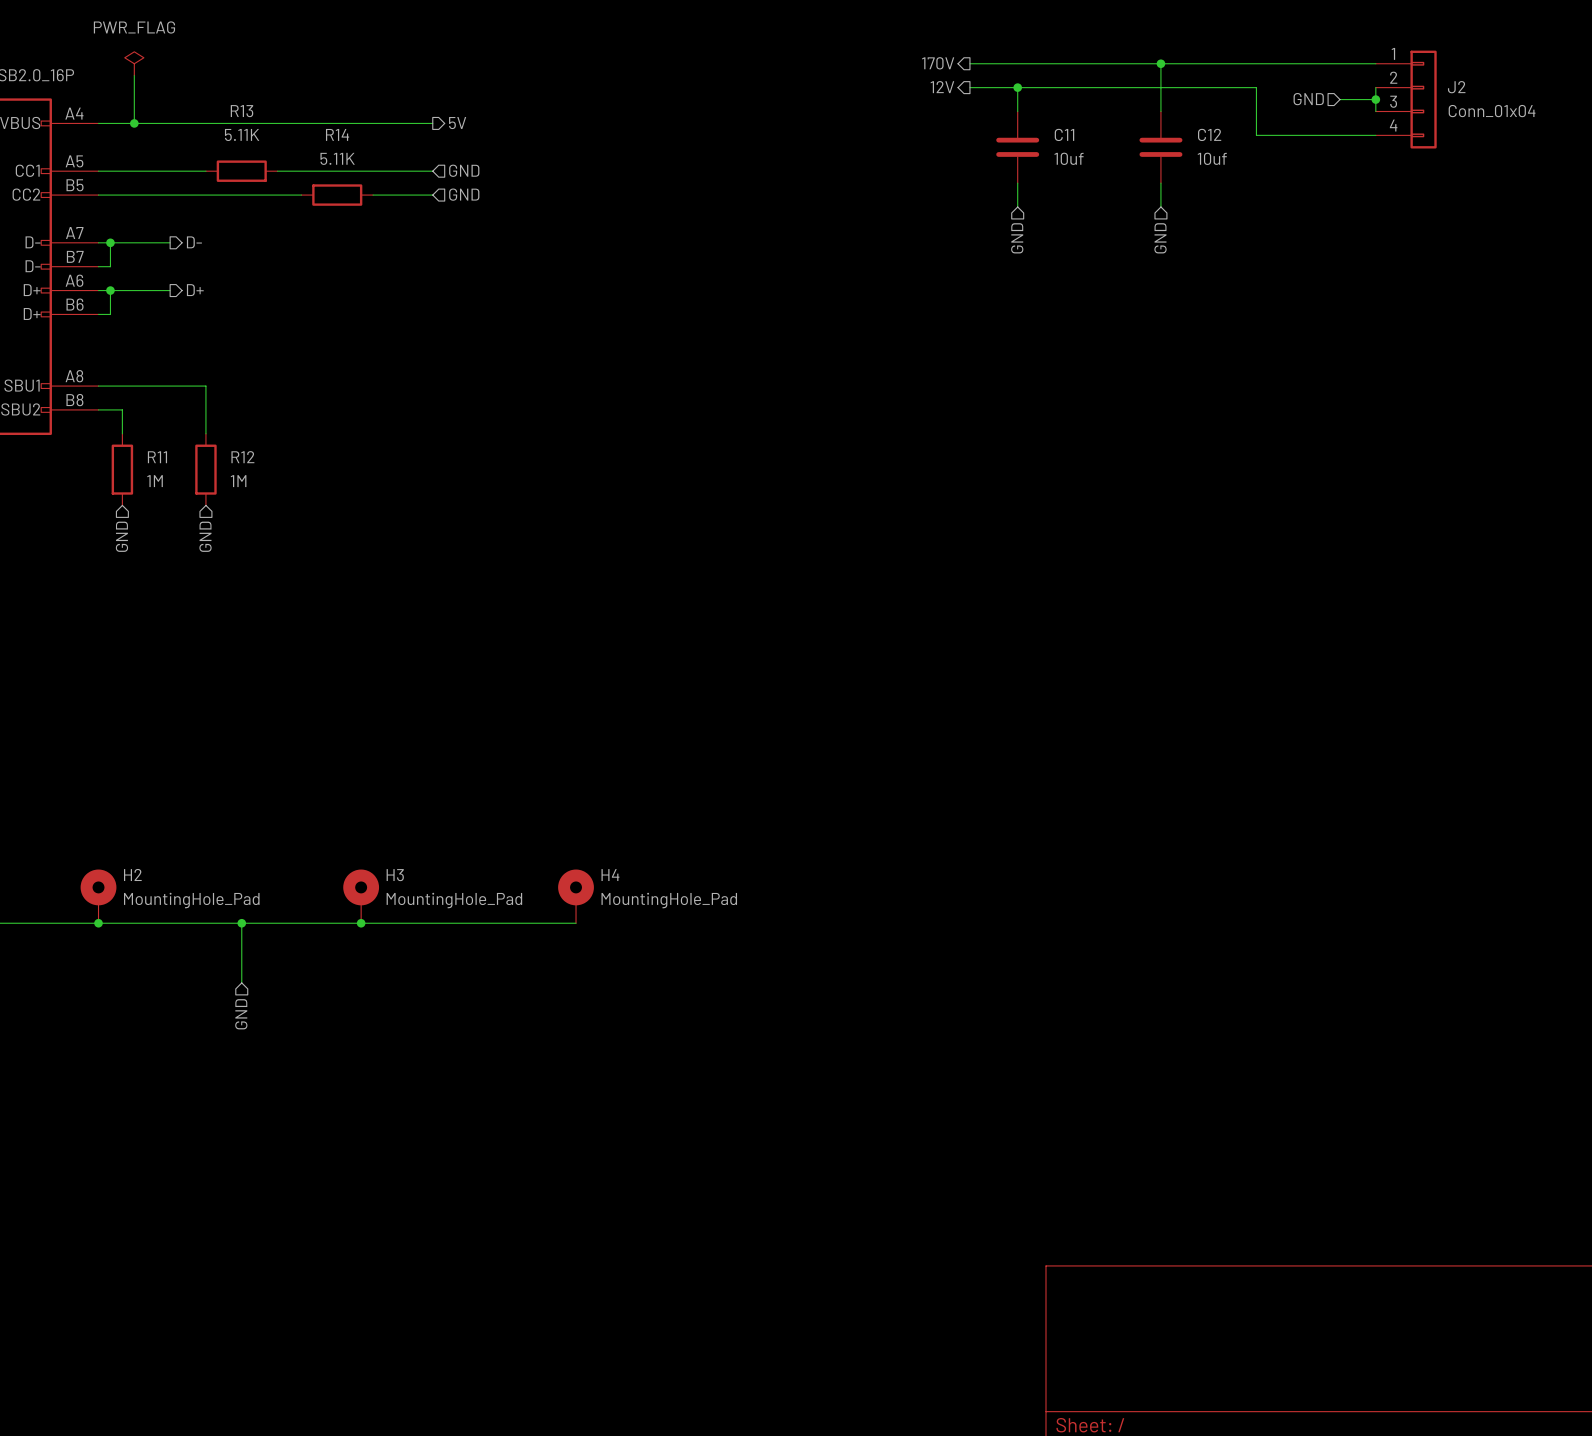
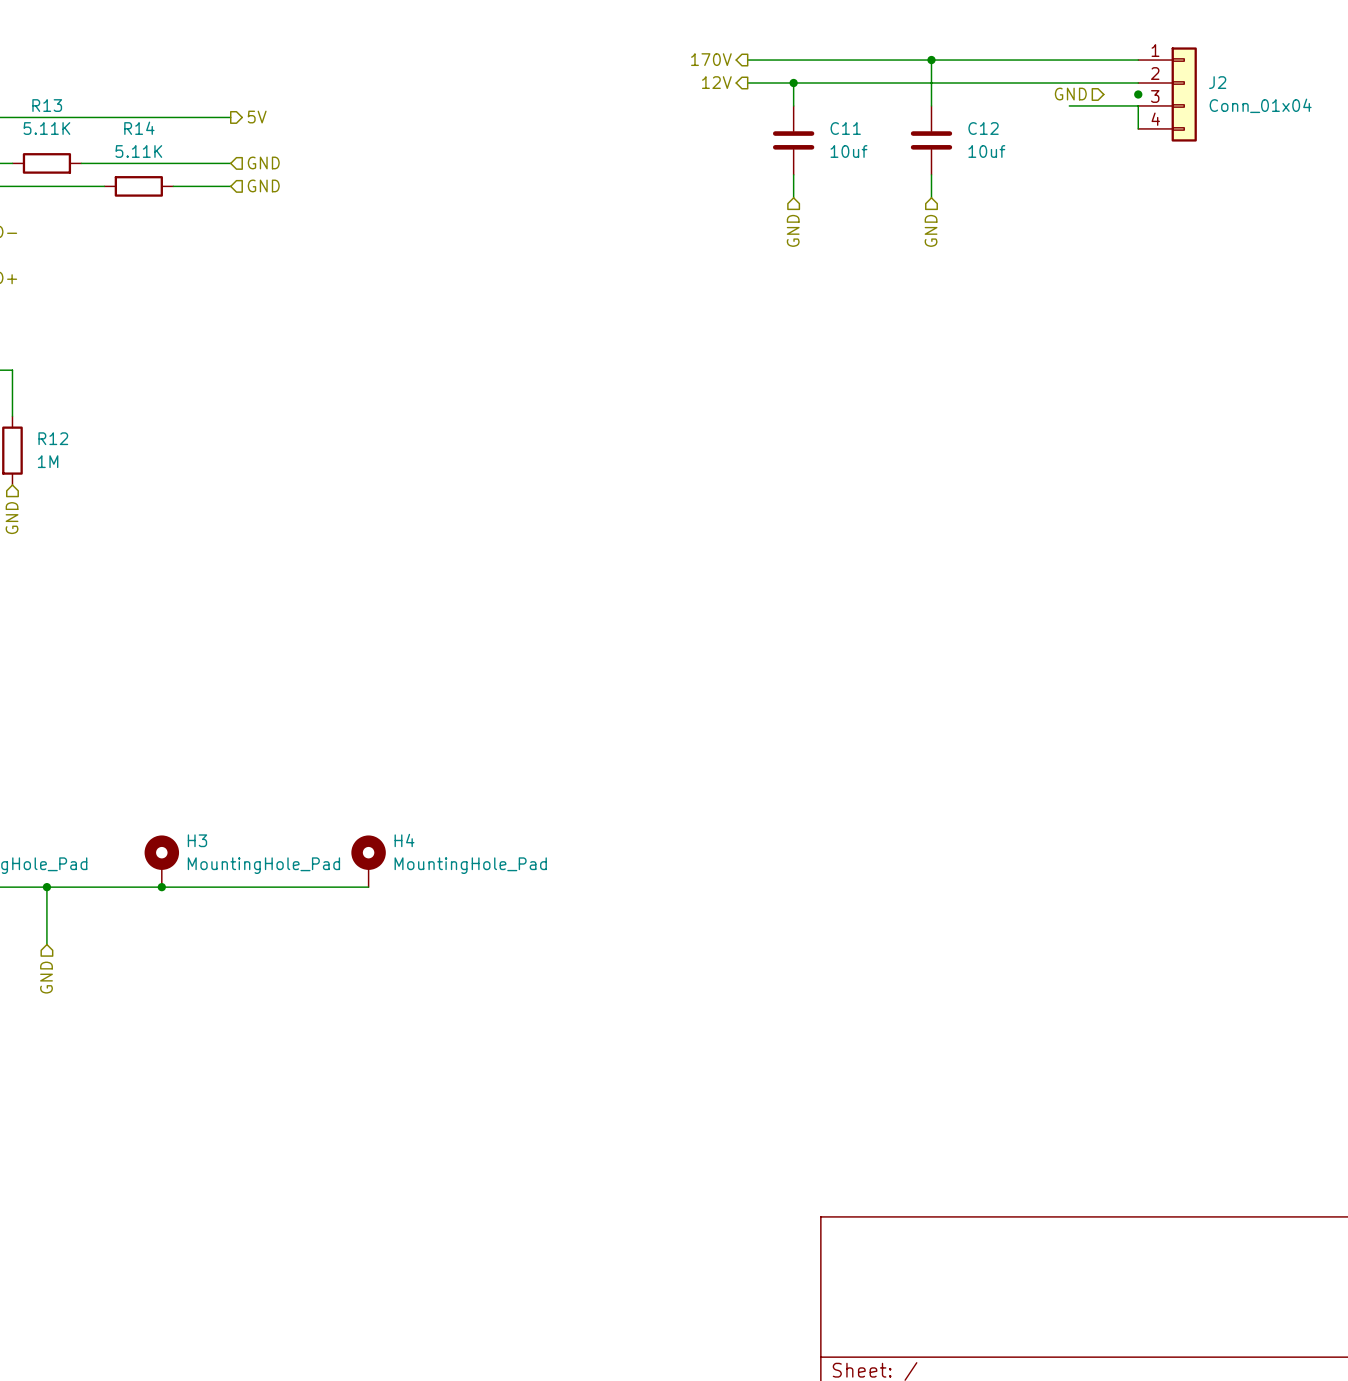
wire: (1256, 87) (1256, 135) (1375, 135) -> (1023, 83) (1138, 83)
wire: (1375, 87) (1375, 111) -> none
wire: (1340, 99) (1375, 99) -> none
wire: none -> (1069, 105) (1138, 105) (1138, 128)

